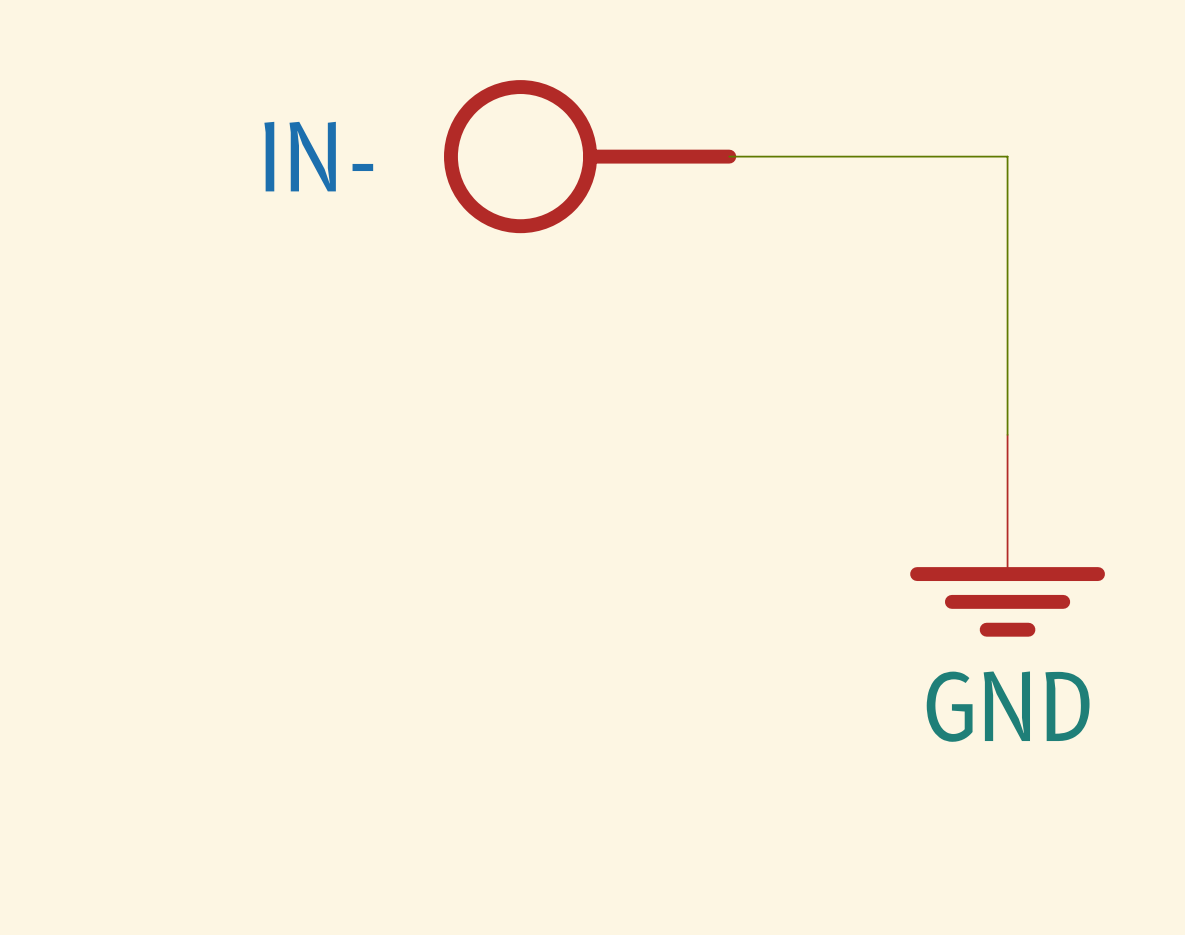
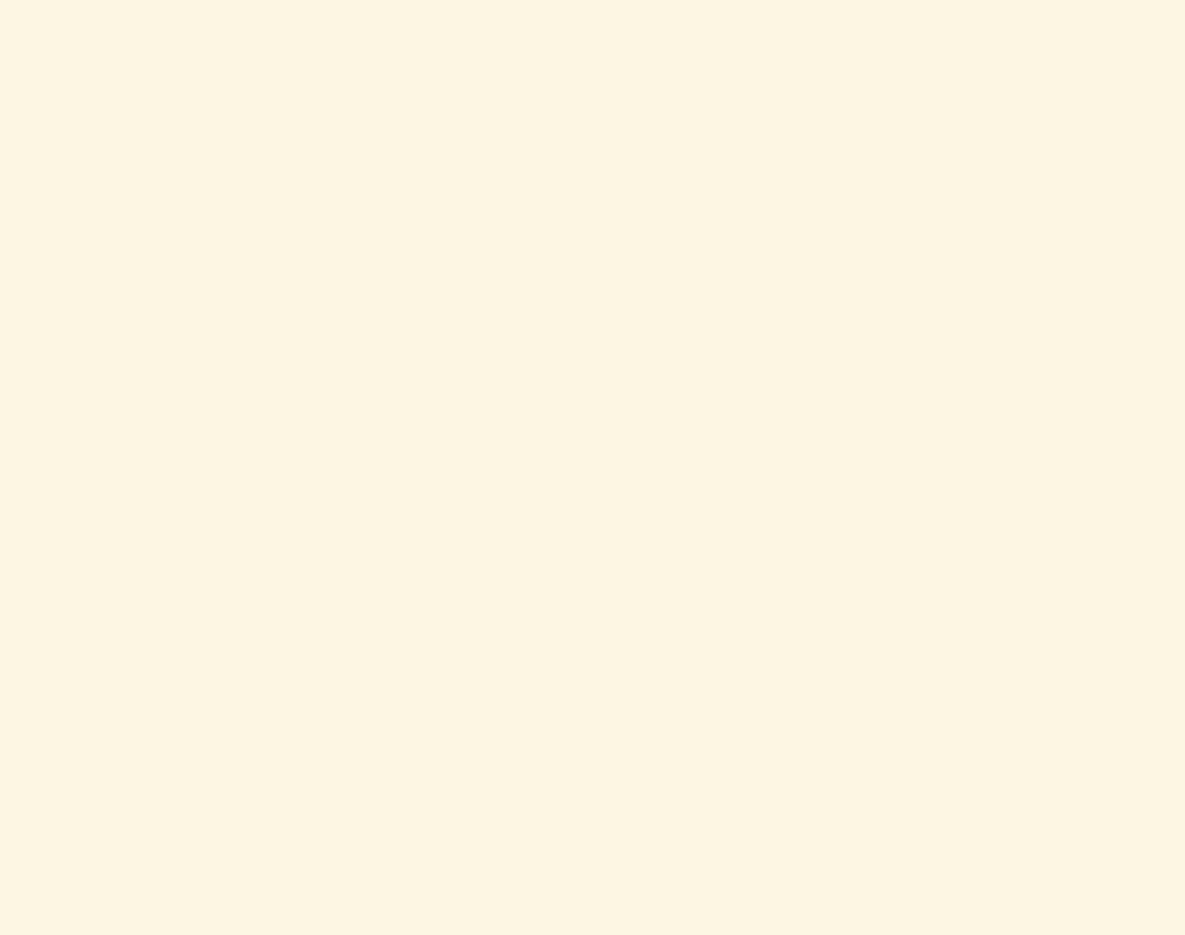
IN-: (590, 156) -> none
wire: (729, 156) (1007, 156) (1007, 434) -> none
power symbol: GND (1007, 535) -> none

